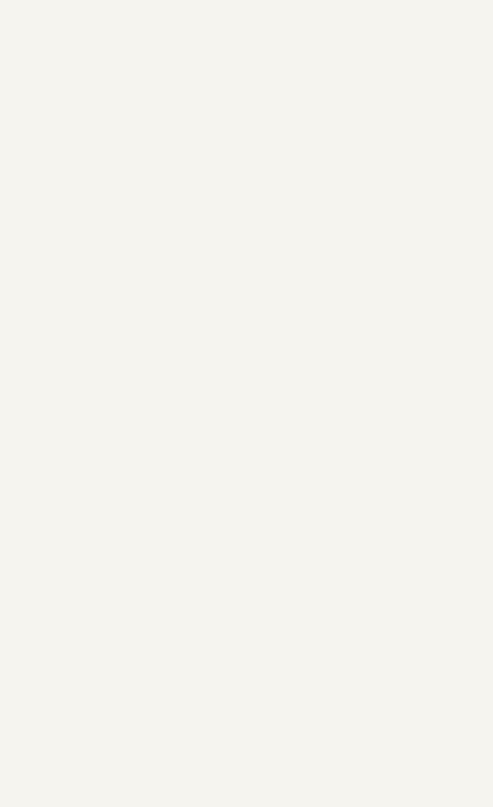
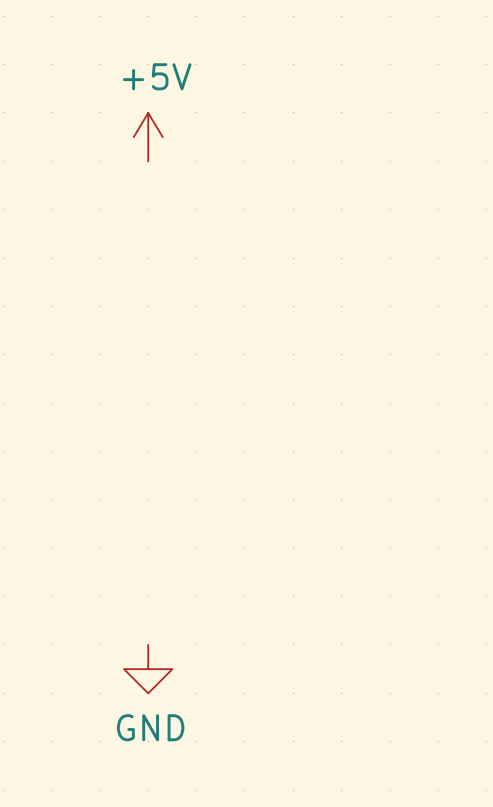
power symbol: none -> +5V (148, 137)
power symbol: none -> GND (148, 669)

